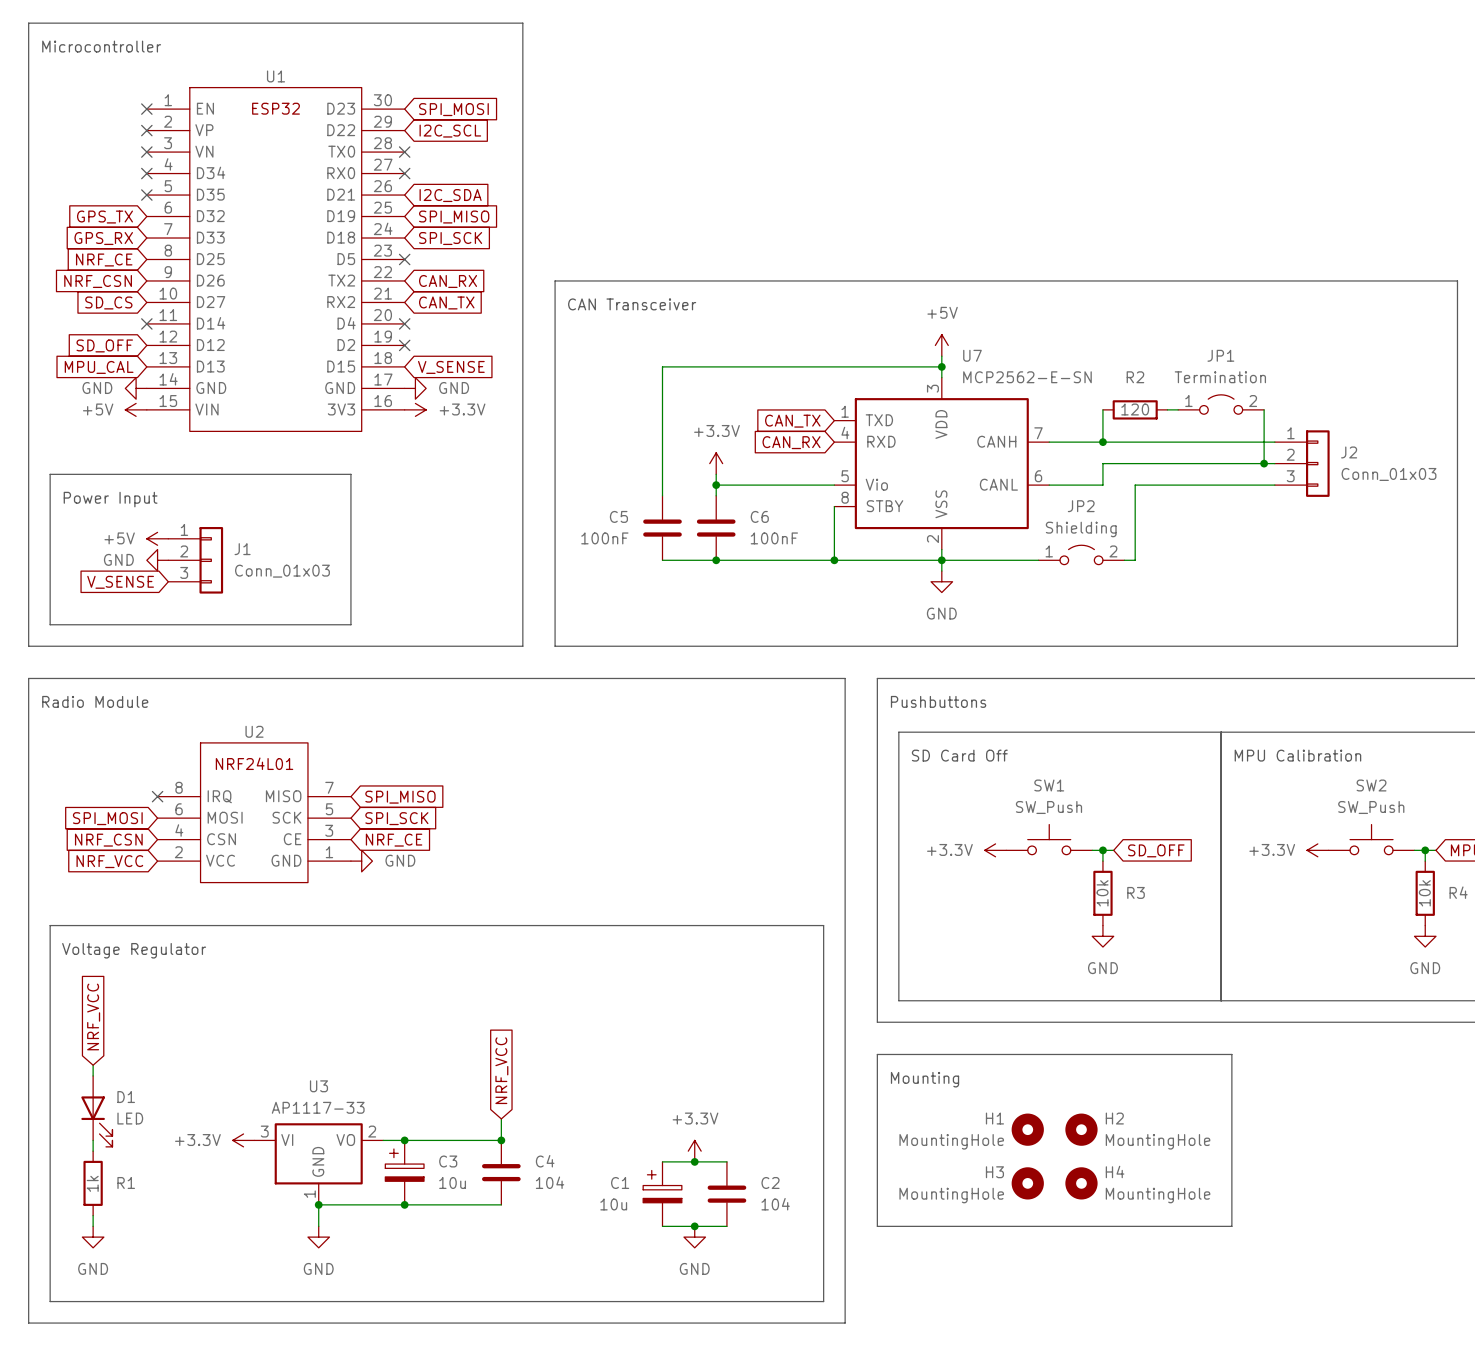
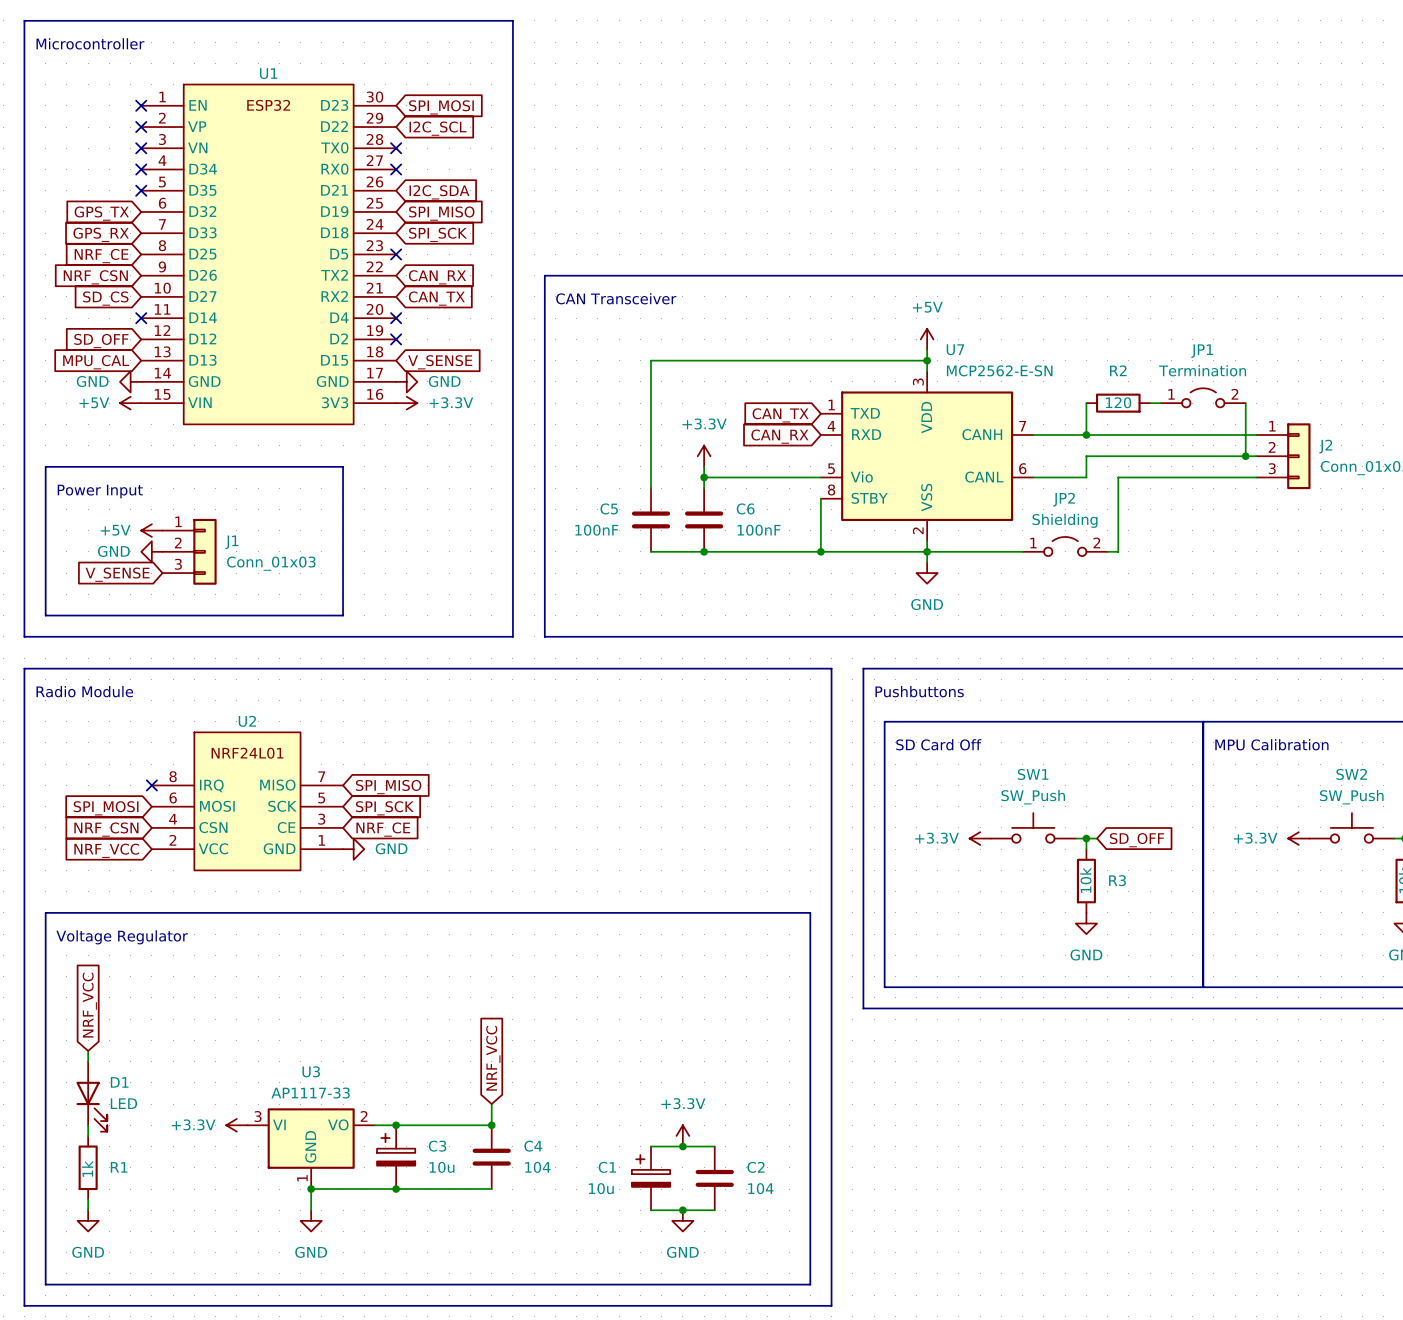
line: (877, 1054) (1231, 1054) (1231, 1226) (877, 1226) (877, 1054) -> none
text: Mounting (925, 1079) -> none
H1: MountingHole (1027, 1129) -> none
H2: MountingHole (1081, 1129) -> none
H3: MountingHole (1027, 1183) -> none
H4: MountingHole (1081, 1183) -> none

